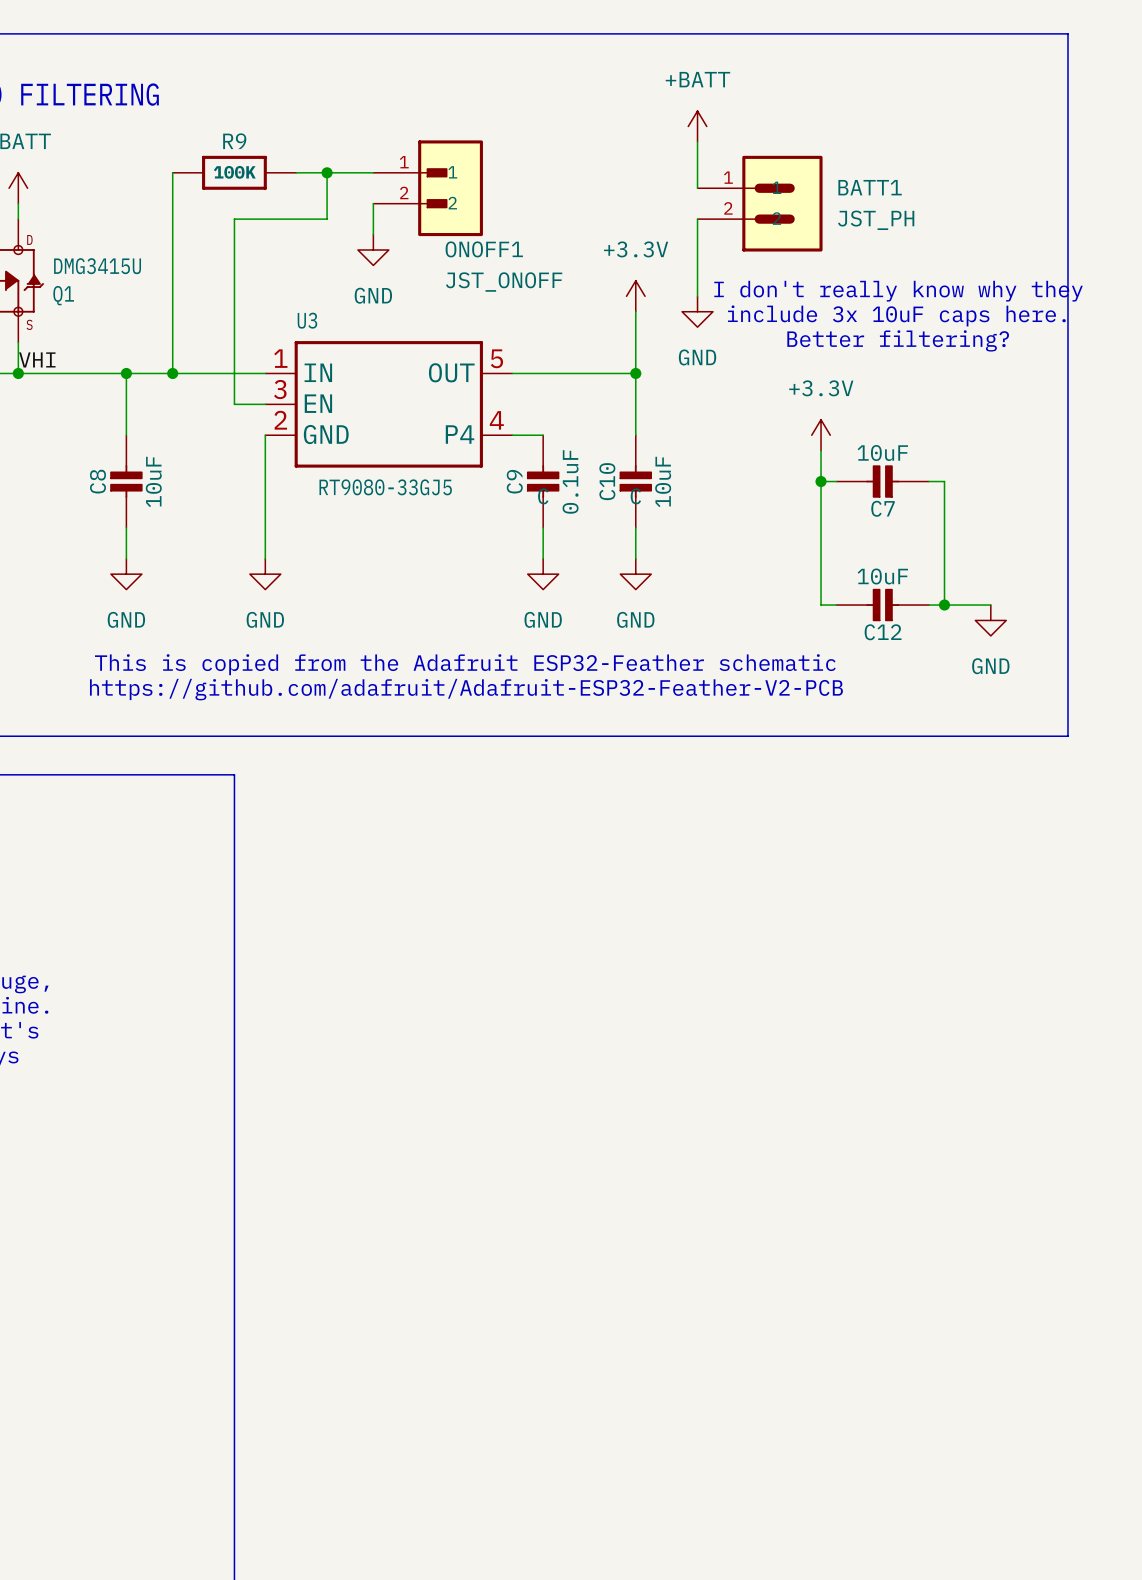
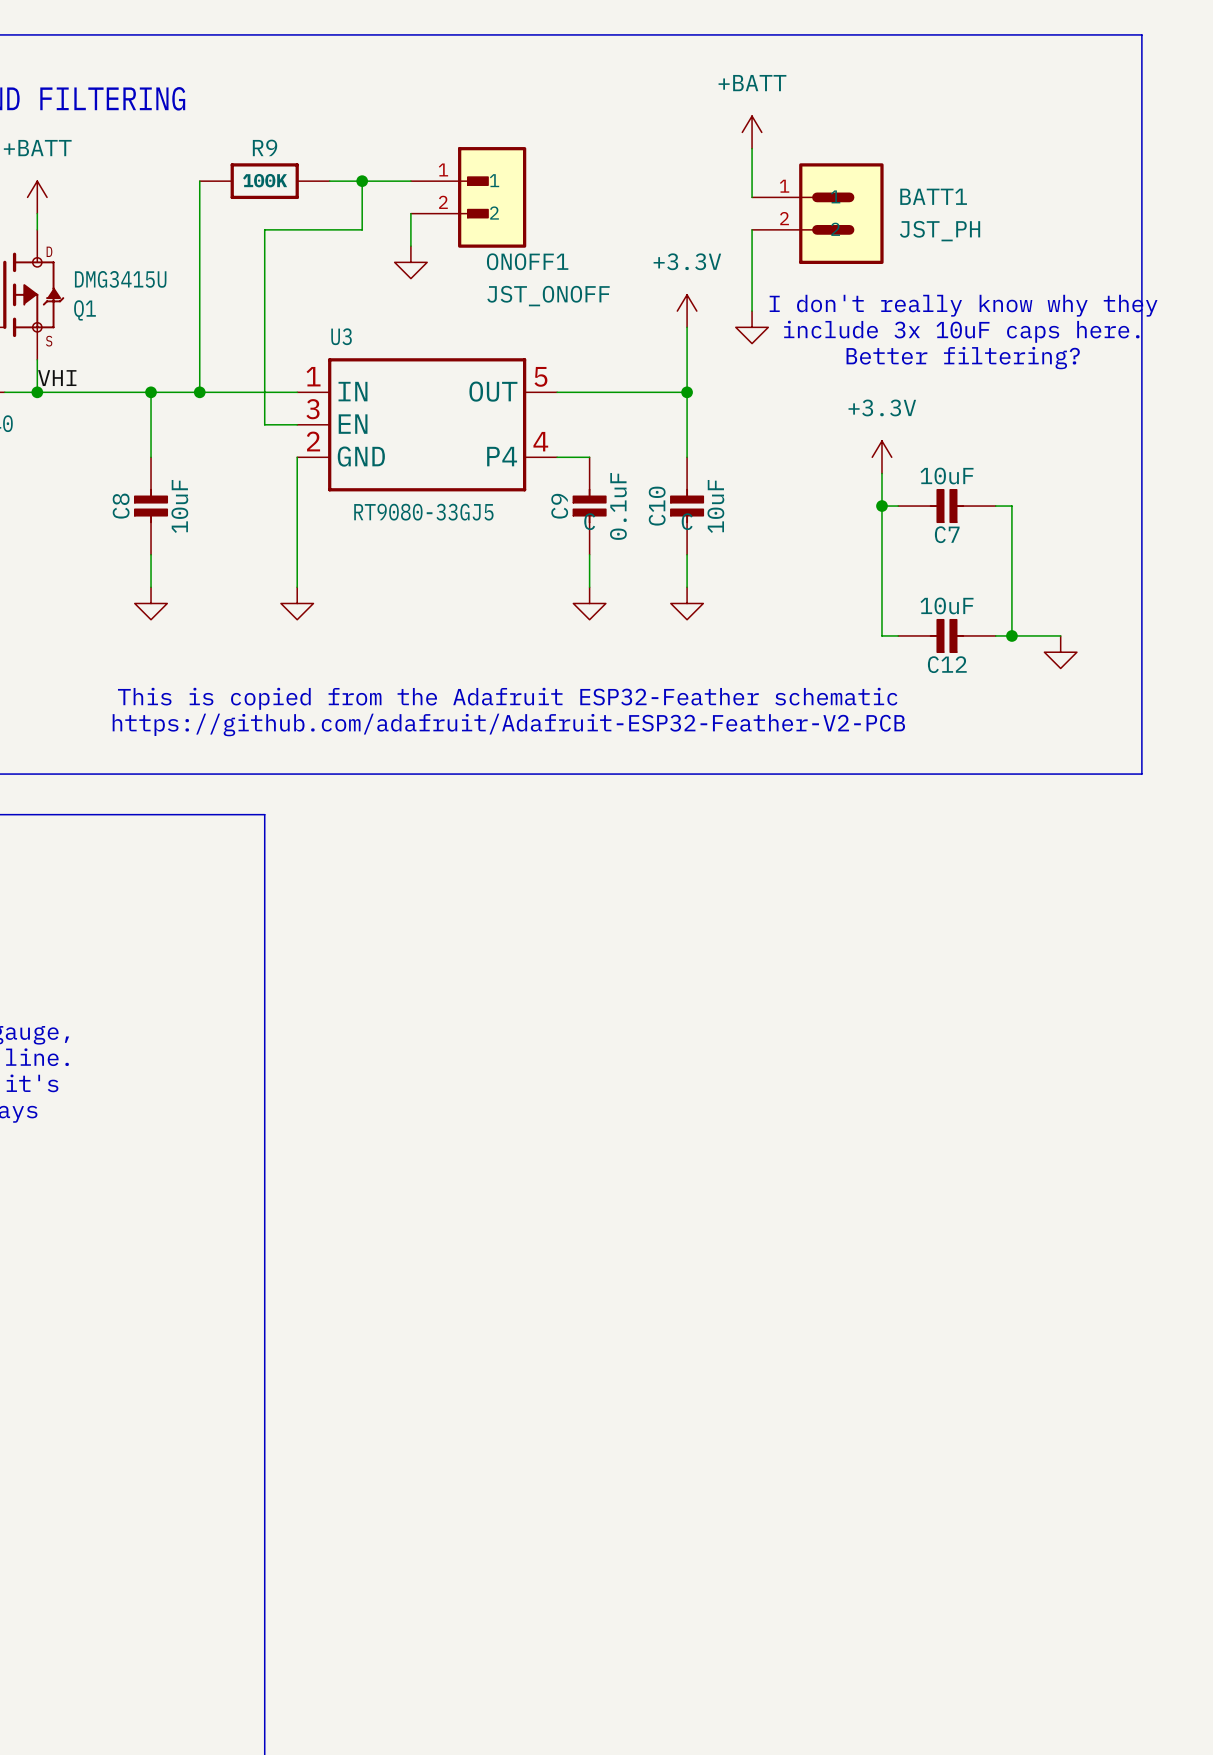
power symbol text: GND (373, 295) -> none
power symbol text: GND (697, 357) -> none
power symbol text: GND (126, 619) -> none
power symbol text: GND (265, 619) -> none
power symbol text: GND (543, 619) -> none
power symbol text: GND (635, 619) -> none
power symbol text: GND (990, 666) -> none

